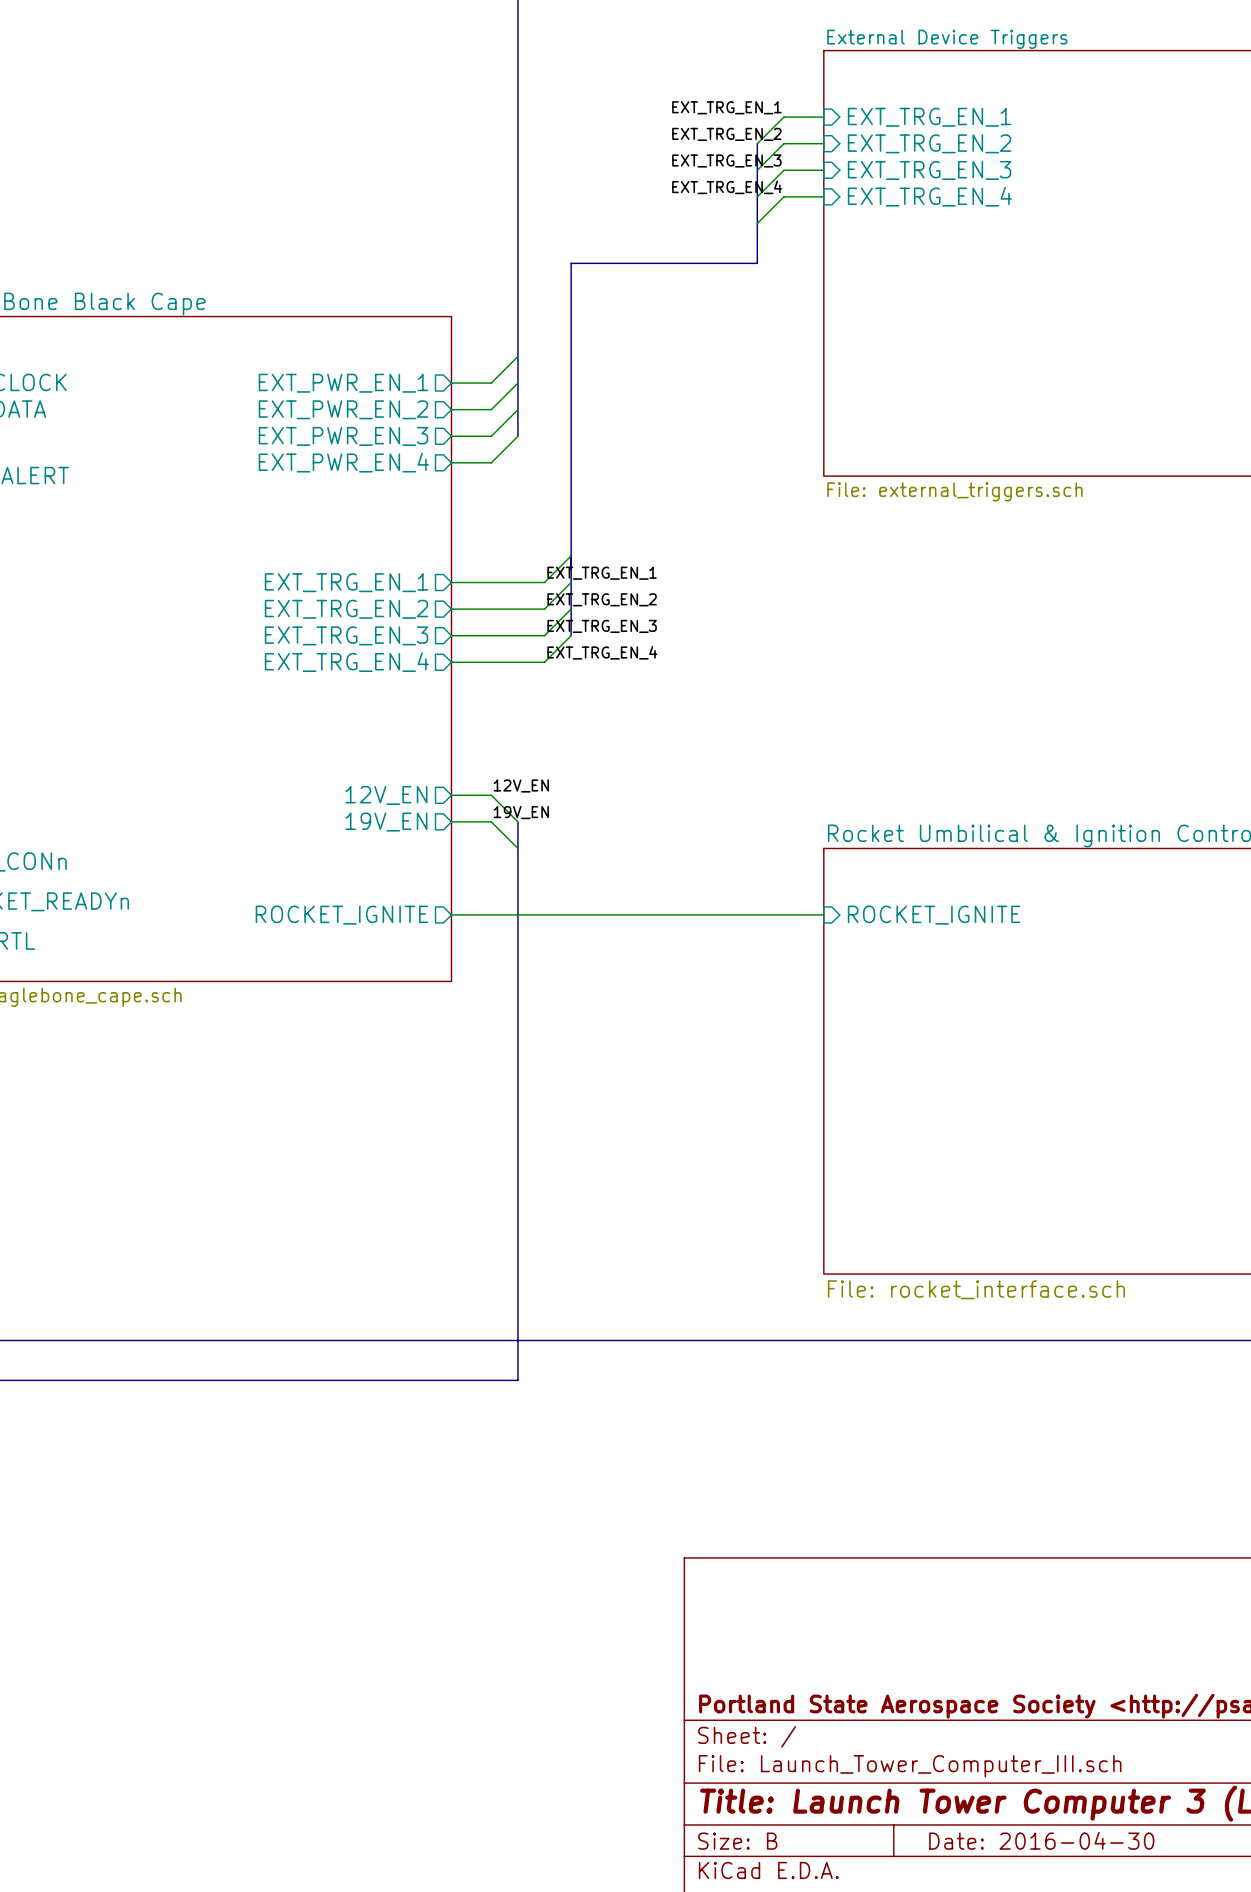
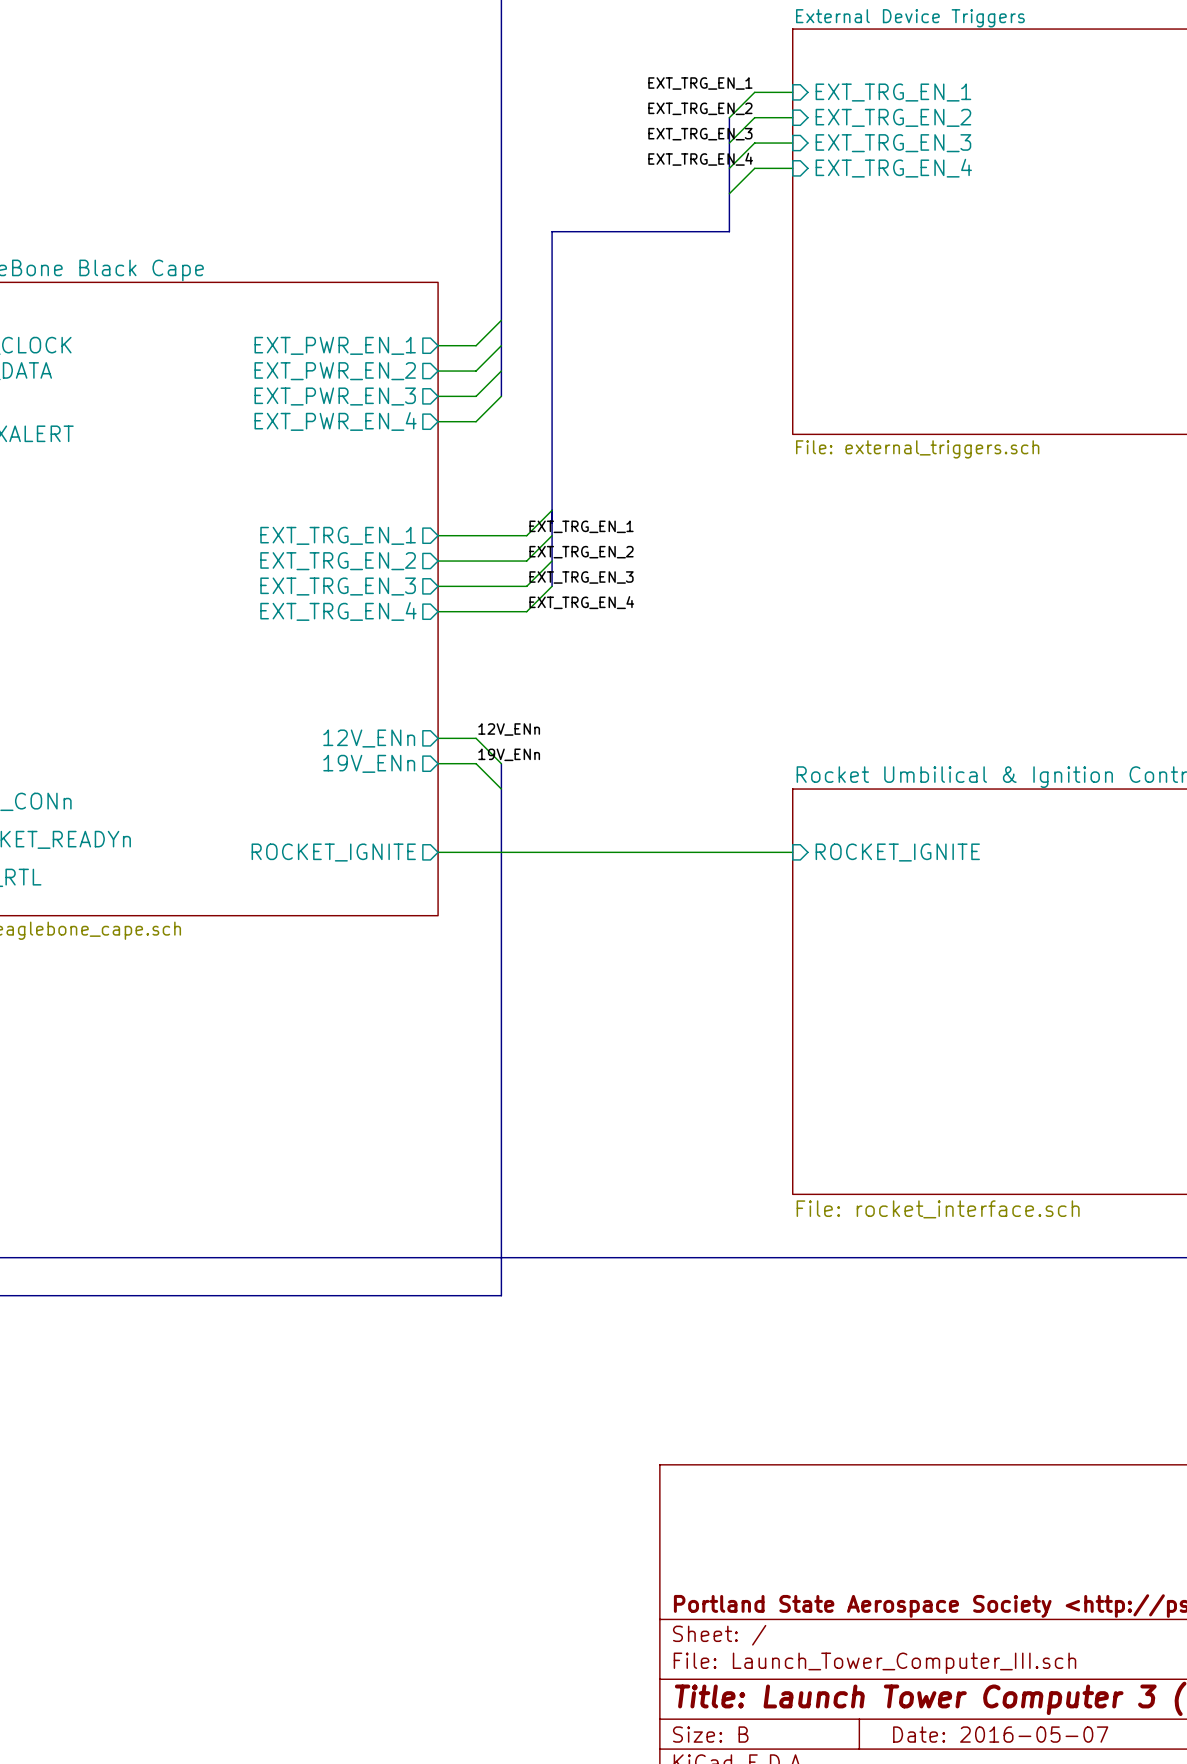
label: 12V_EN (521, 785) -> 12V_ENn (509, 729)
sheet pin: 12V_EN (386, 795) -> 12V_ENn (369, 738)
label: 19V_EN (521, 812) -> 19V_ENn (509, 754)
sheet pin: 19V_EN (386, 822) -> 19V_ENn (369, 763)
title block: Date: 2016-04-30 (1041, 1840) -> Date: 2016-05-07 (1000, 1734)

